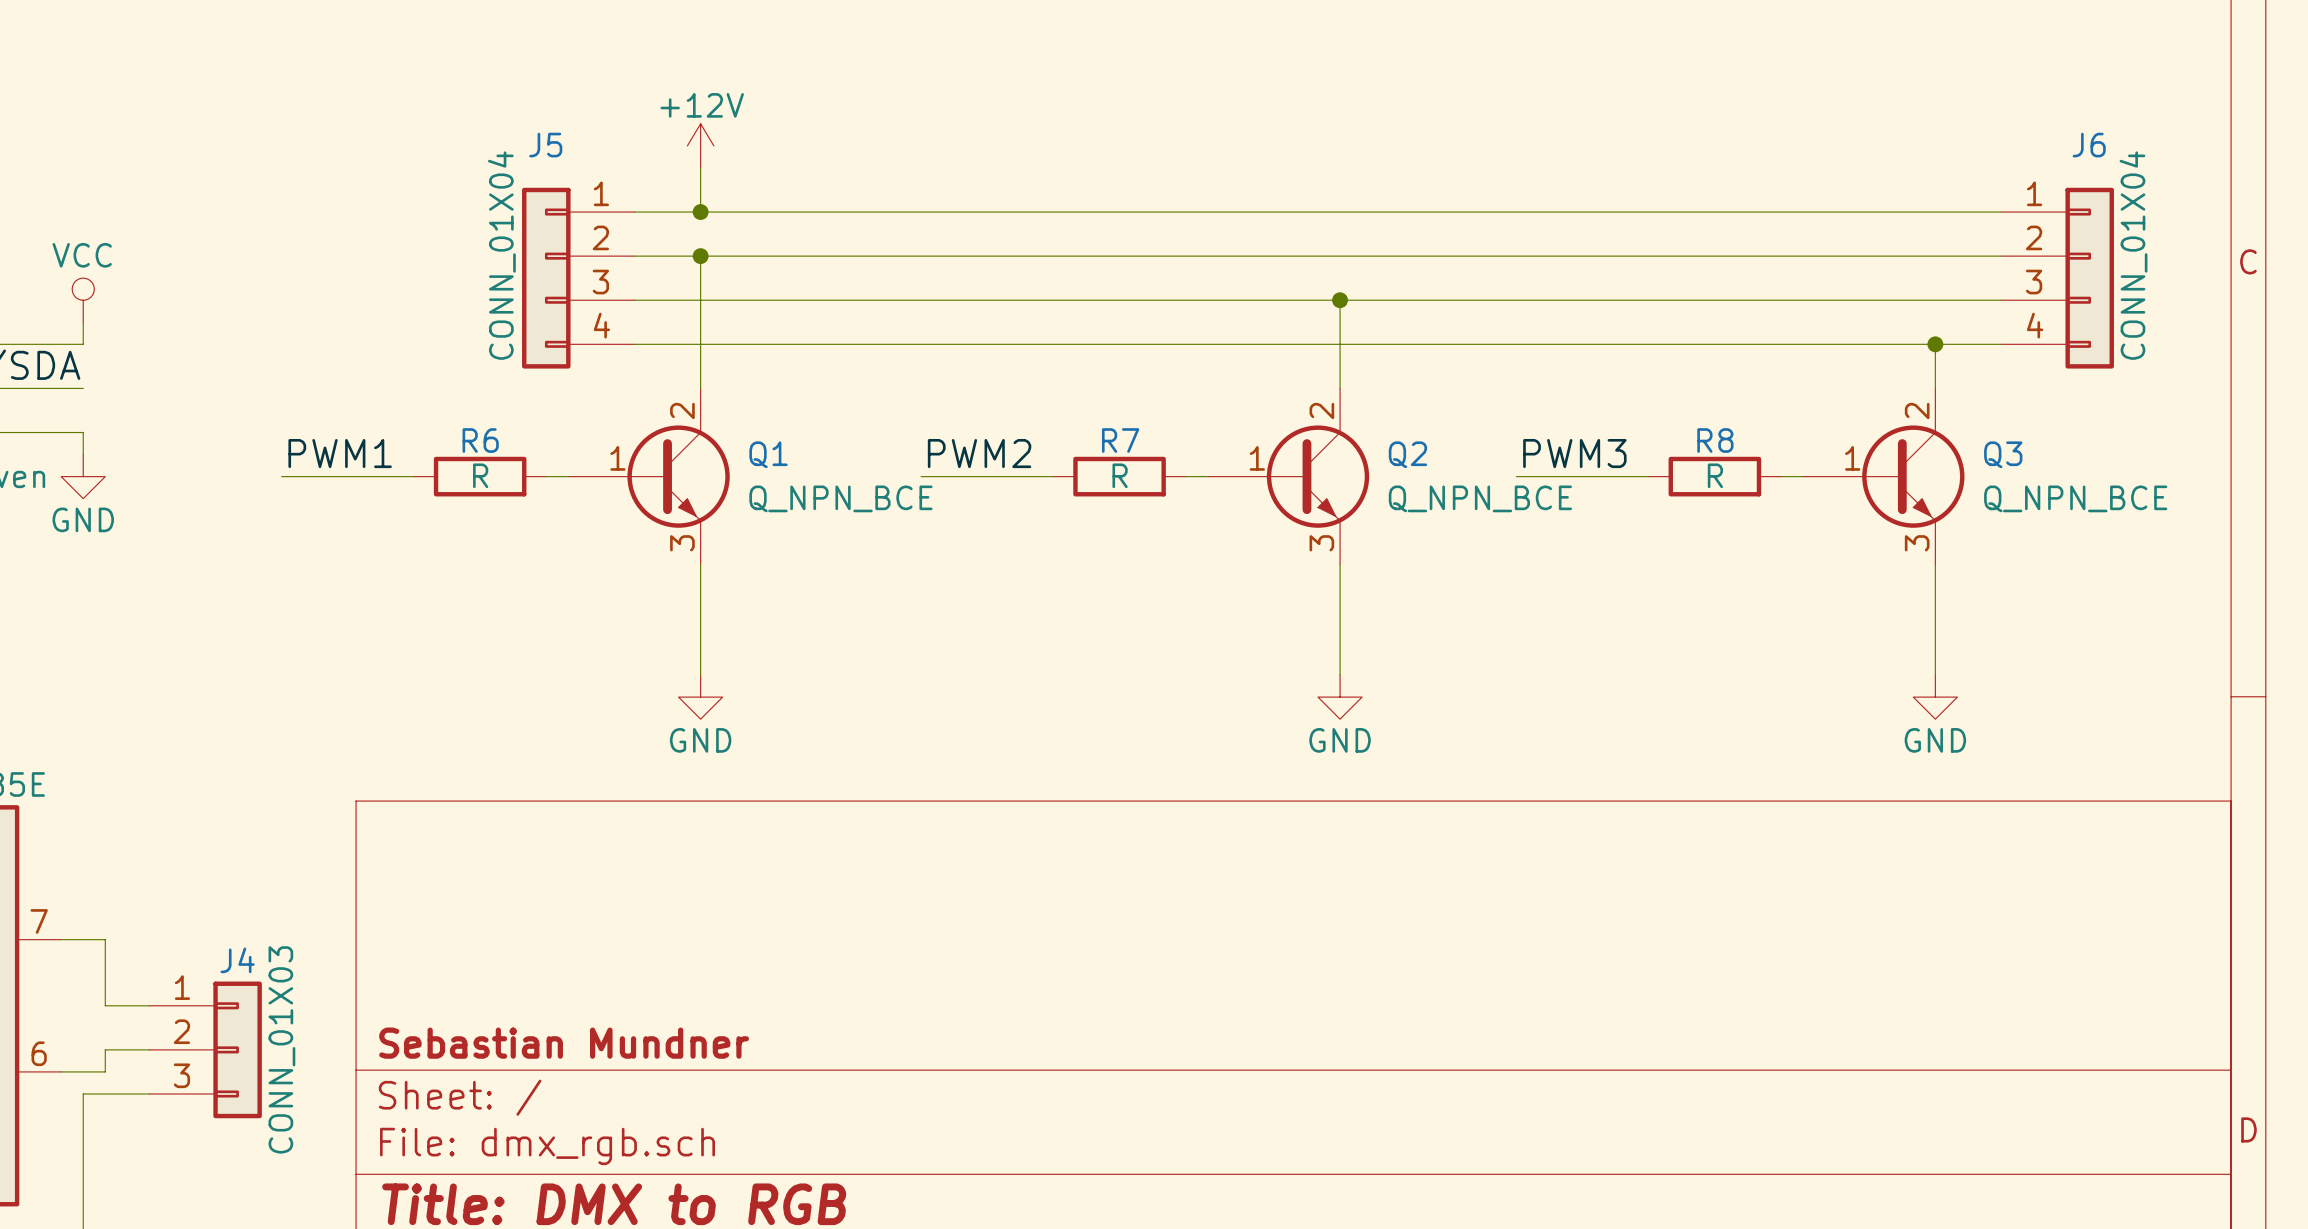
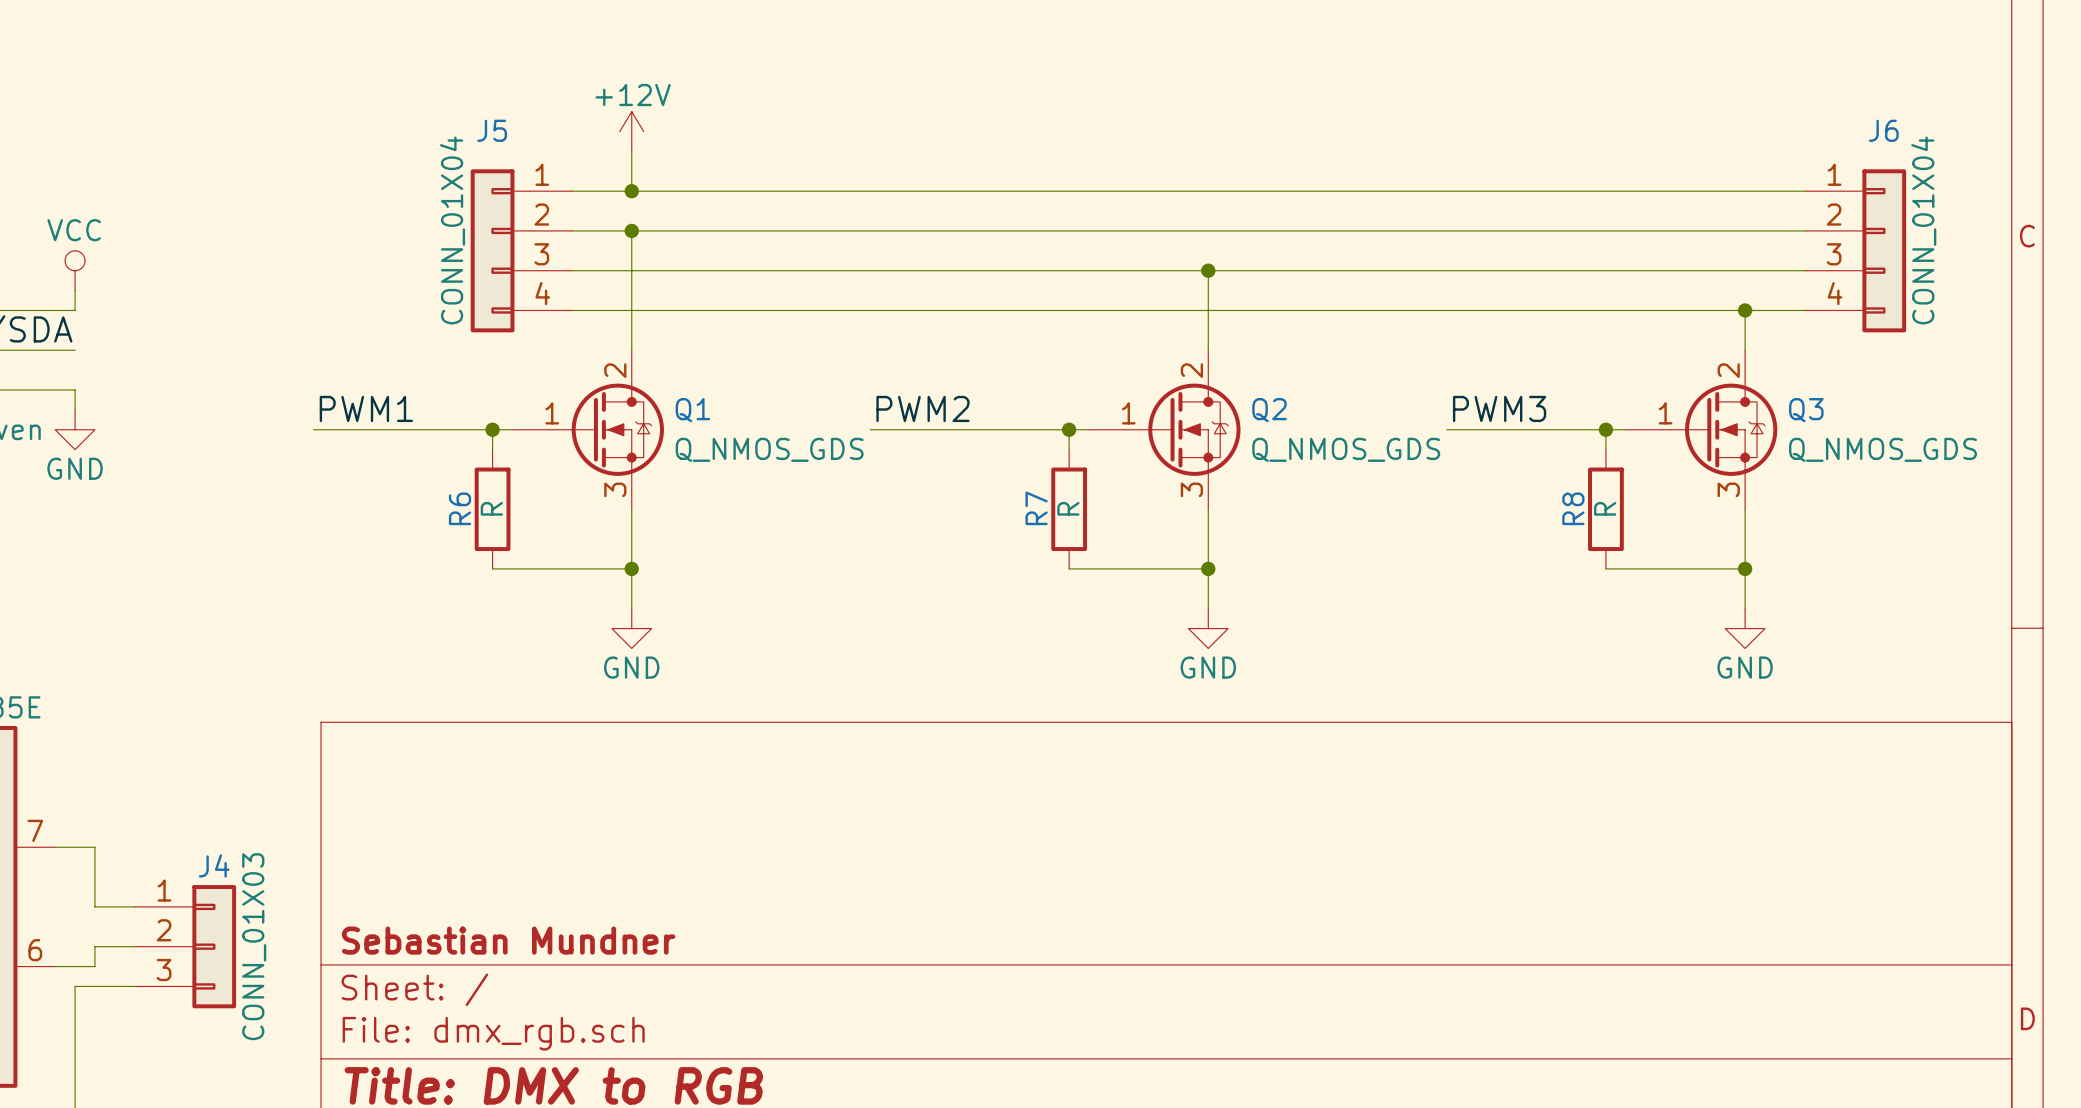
Q1 symbol: [568, 388, 730, 565] -> [512, 350, 664, 510]
Q2 symbol: [1207, 388, 1370, 565] -> [1089, 350, 1241, 510]
Q3 symbol: [1803, 388, 1965, 565] -> [1625, 350, 1778, 510]
R6 name position: R6 (480, 440) -> R6 (460, 508)
R7 name position: R7 (1120, 440) -> R7 (1036, 508)
R8 name position: R8 (1715, 440) -> R8 (1573, 508)
label position: PWM1 (340, 453) -> PWM1 (366, 408)
label position: PWM2 (979, 453) -> PWM2 (923, 408)
label position: PWM3 (1574, 453) -> PWM3 (1499, 408)
wire: (281, 476) (347, 476) -> none
wire: none -> (373, 429) (492, 429) (492, 449)
R6 rotation: 0° (480, 476) -> 90° clockwise (492, 509)
R6 position: (480, 476) -> (492, 509)
junction: none -> (492, 429)
wire: (921, 476) (965, 476) -> none
wire: none -> (949, 429) (1069, 429) (1069, 449)
R7 rotation: 0° (1119, 476) -> 90° clockwise (1069, 509)
R7 position: (1119, 476) -> (1069, 509)
junction: none -> (1069, 429)
wire: (1516, 476) (1604, 476) -> none
wire: none -> (1486, 429) (1605, 429) (1605, 449)
R8 rotation: 0° (1714, 476) -> 90° clockwise (1605, 509)
R8 position: (1714, 476) -> (1605, 509)
junction: none -> (1605, 429)
Q1 value: Q_NPN_BCE (840, 498) -> Q_NMOS_GDS (769, 449)
Q2 value: Q_NPN_BCE (1480, 498) -> Q_NMOS_GDS (1346, 449)
Q3 value: Q_NPN_BCE (2075, 498) -> Q_NMOS_GDS (1883, 449)
wire: none -> (492, 568) (631, 568)
junction: none -> (631, 568)
wire: none -> (1069, 568) (1208, 568)
junction: none -> (1208, 568)
wire: none -> (1605, 568) (1745, 568)
junction: none -> (1745, 568)

